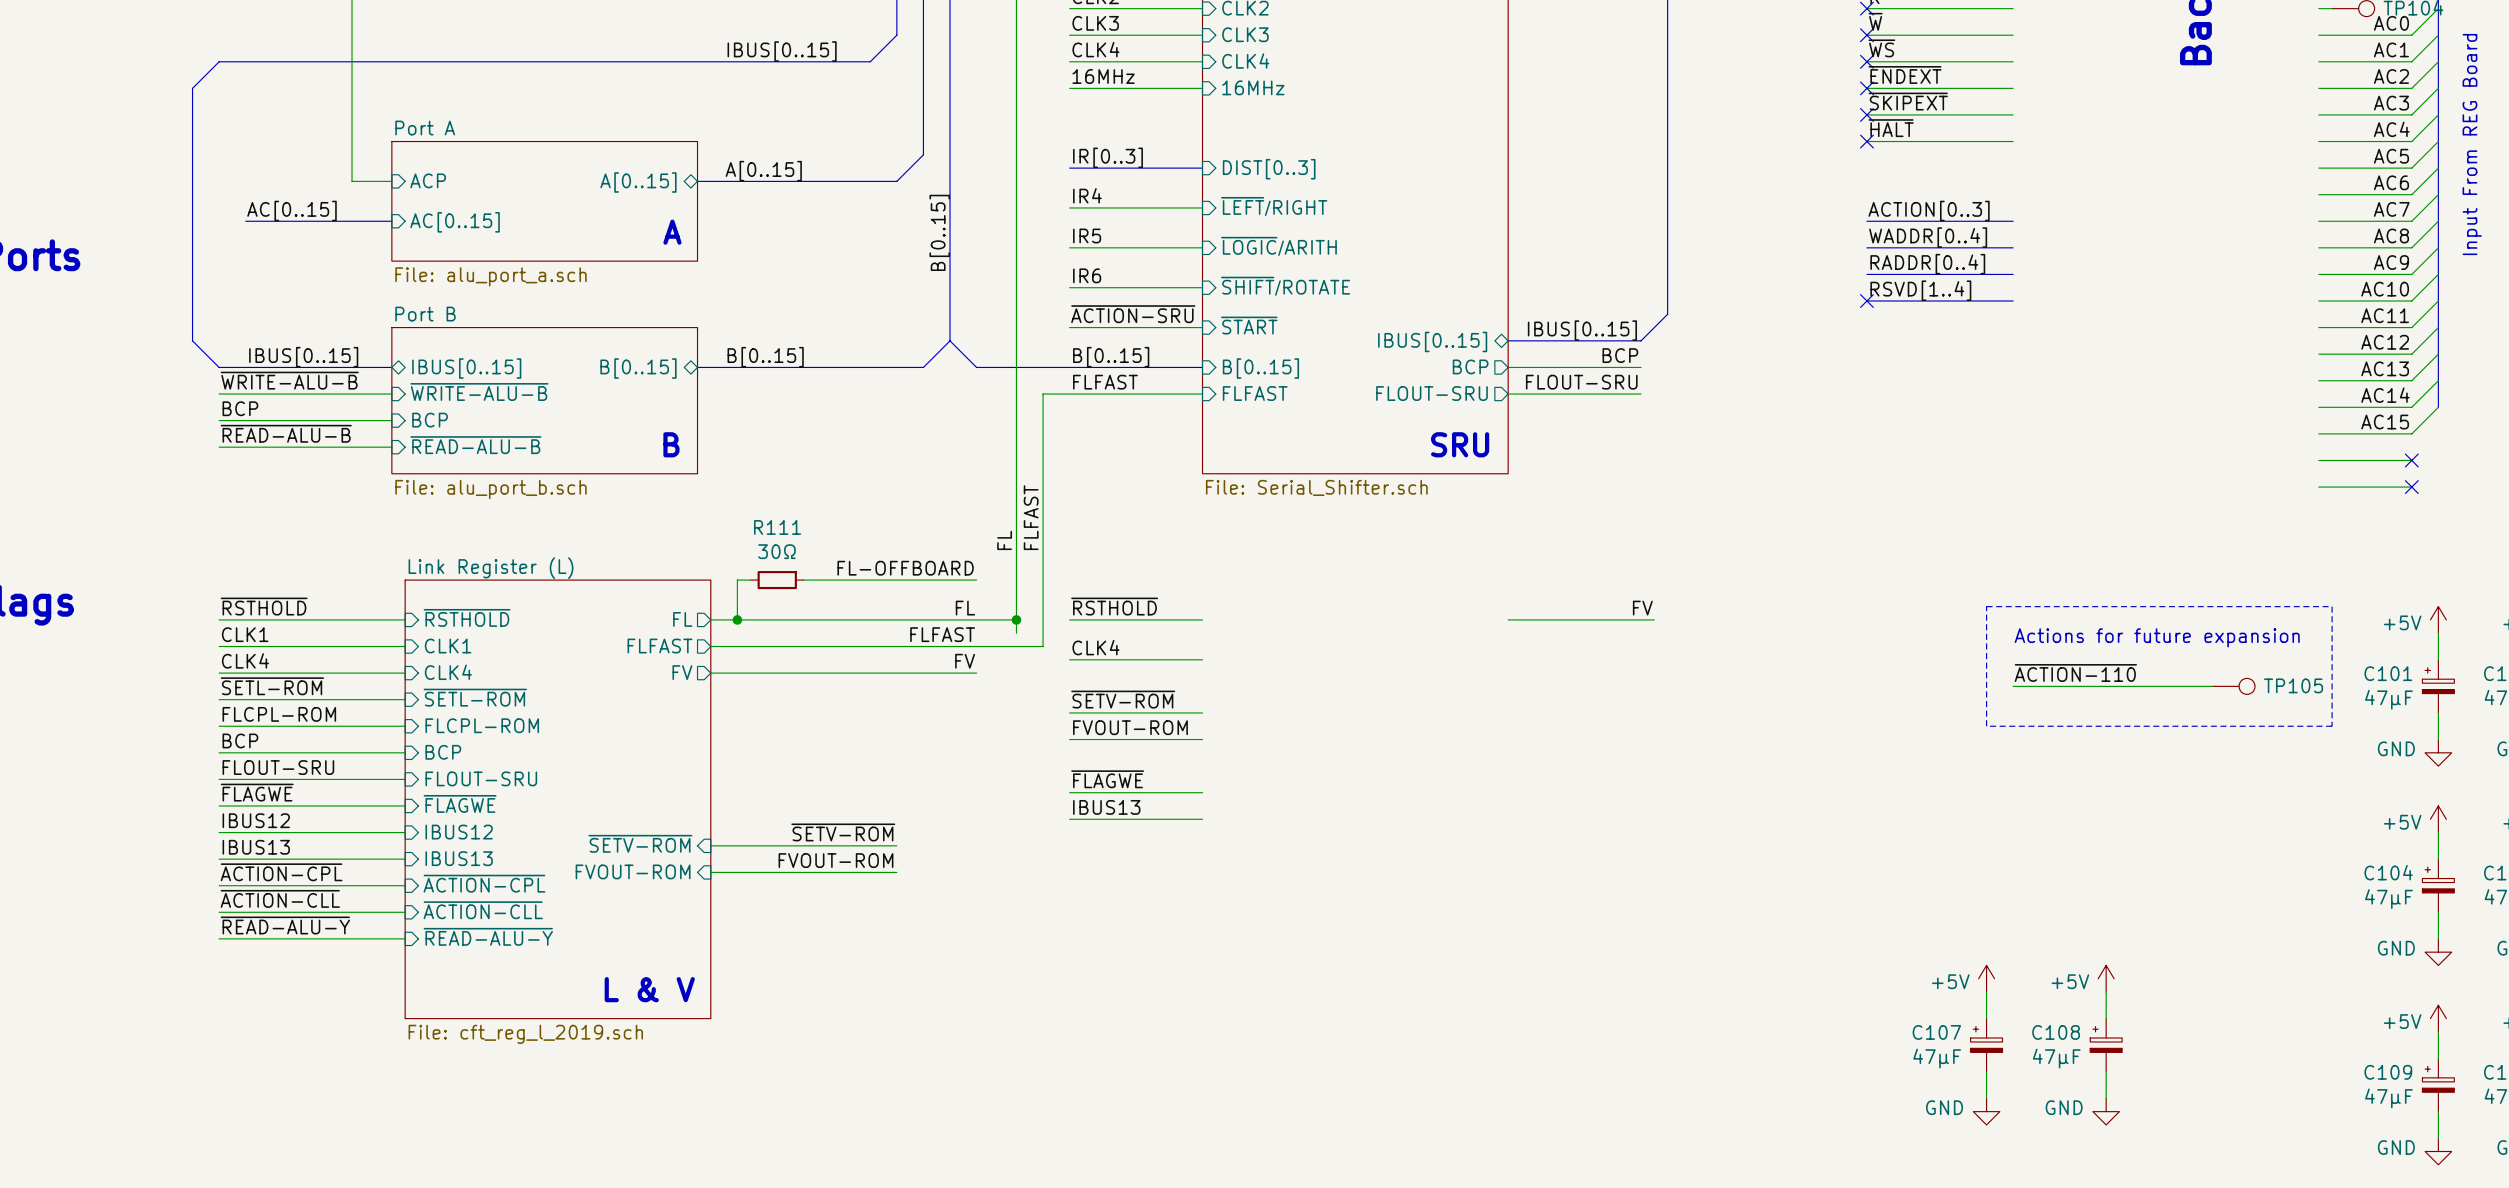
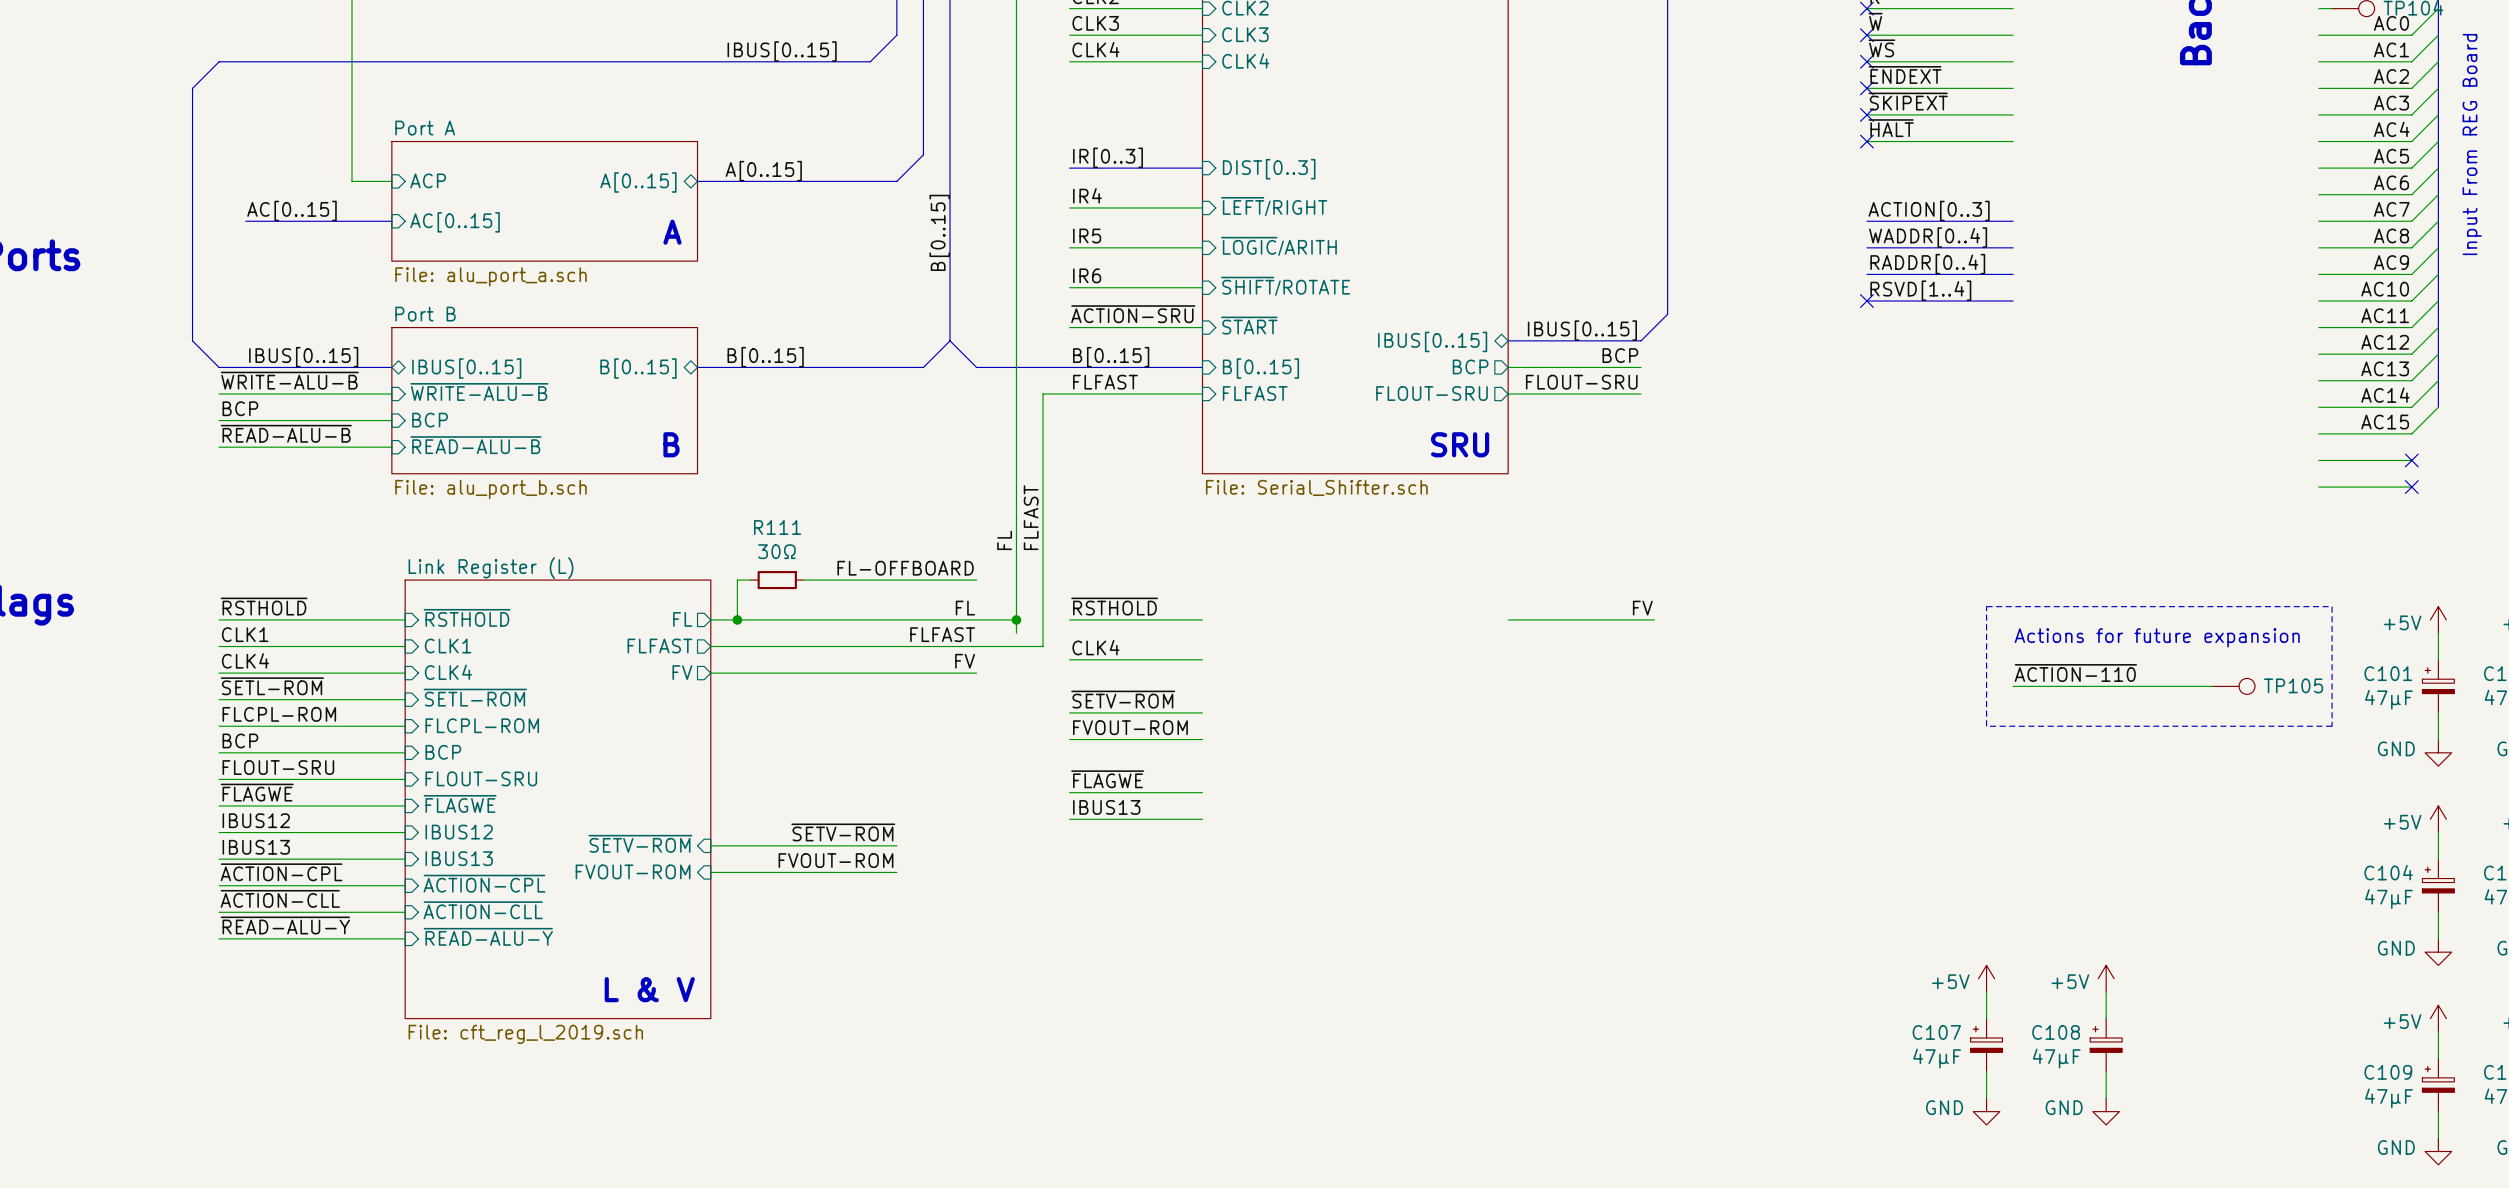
label: 16MHz (1103, 76) -> none
sheet pin: 16MHz (1253, 87) -> none
wire: (1069, 88) (1202, 88) -> none

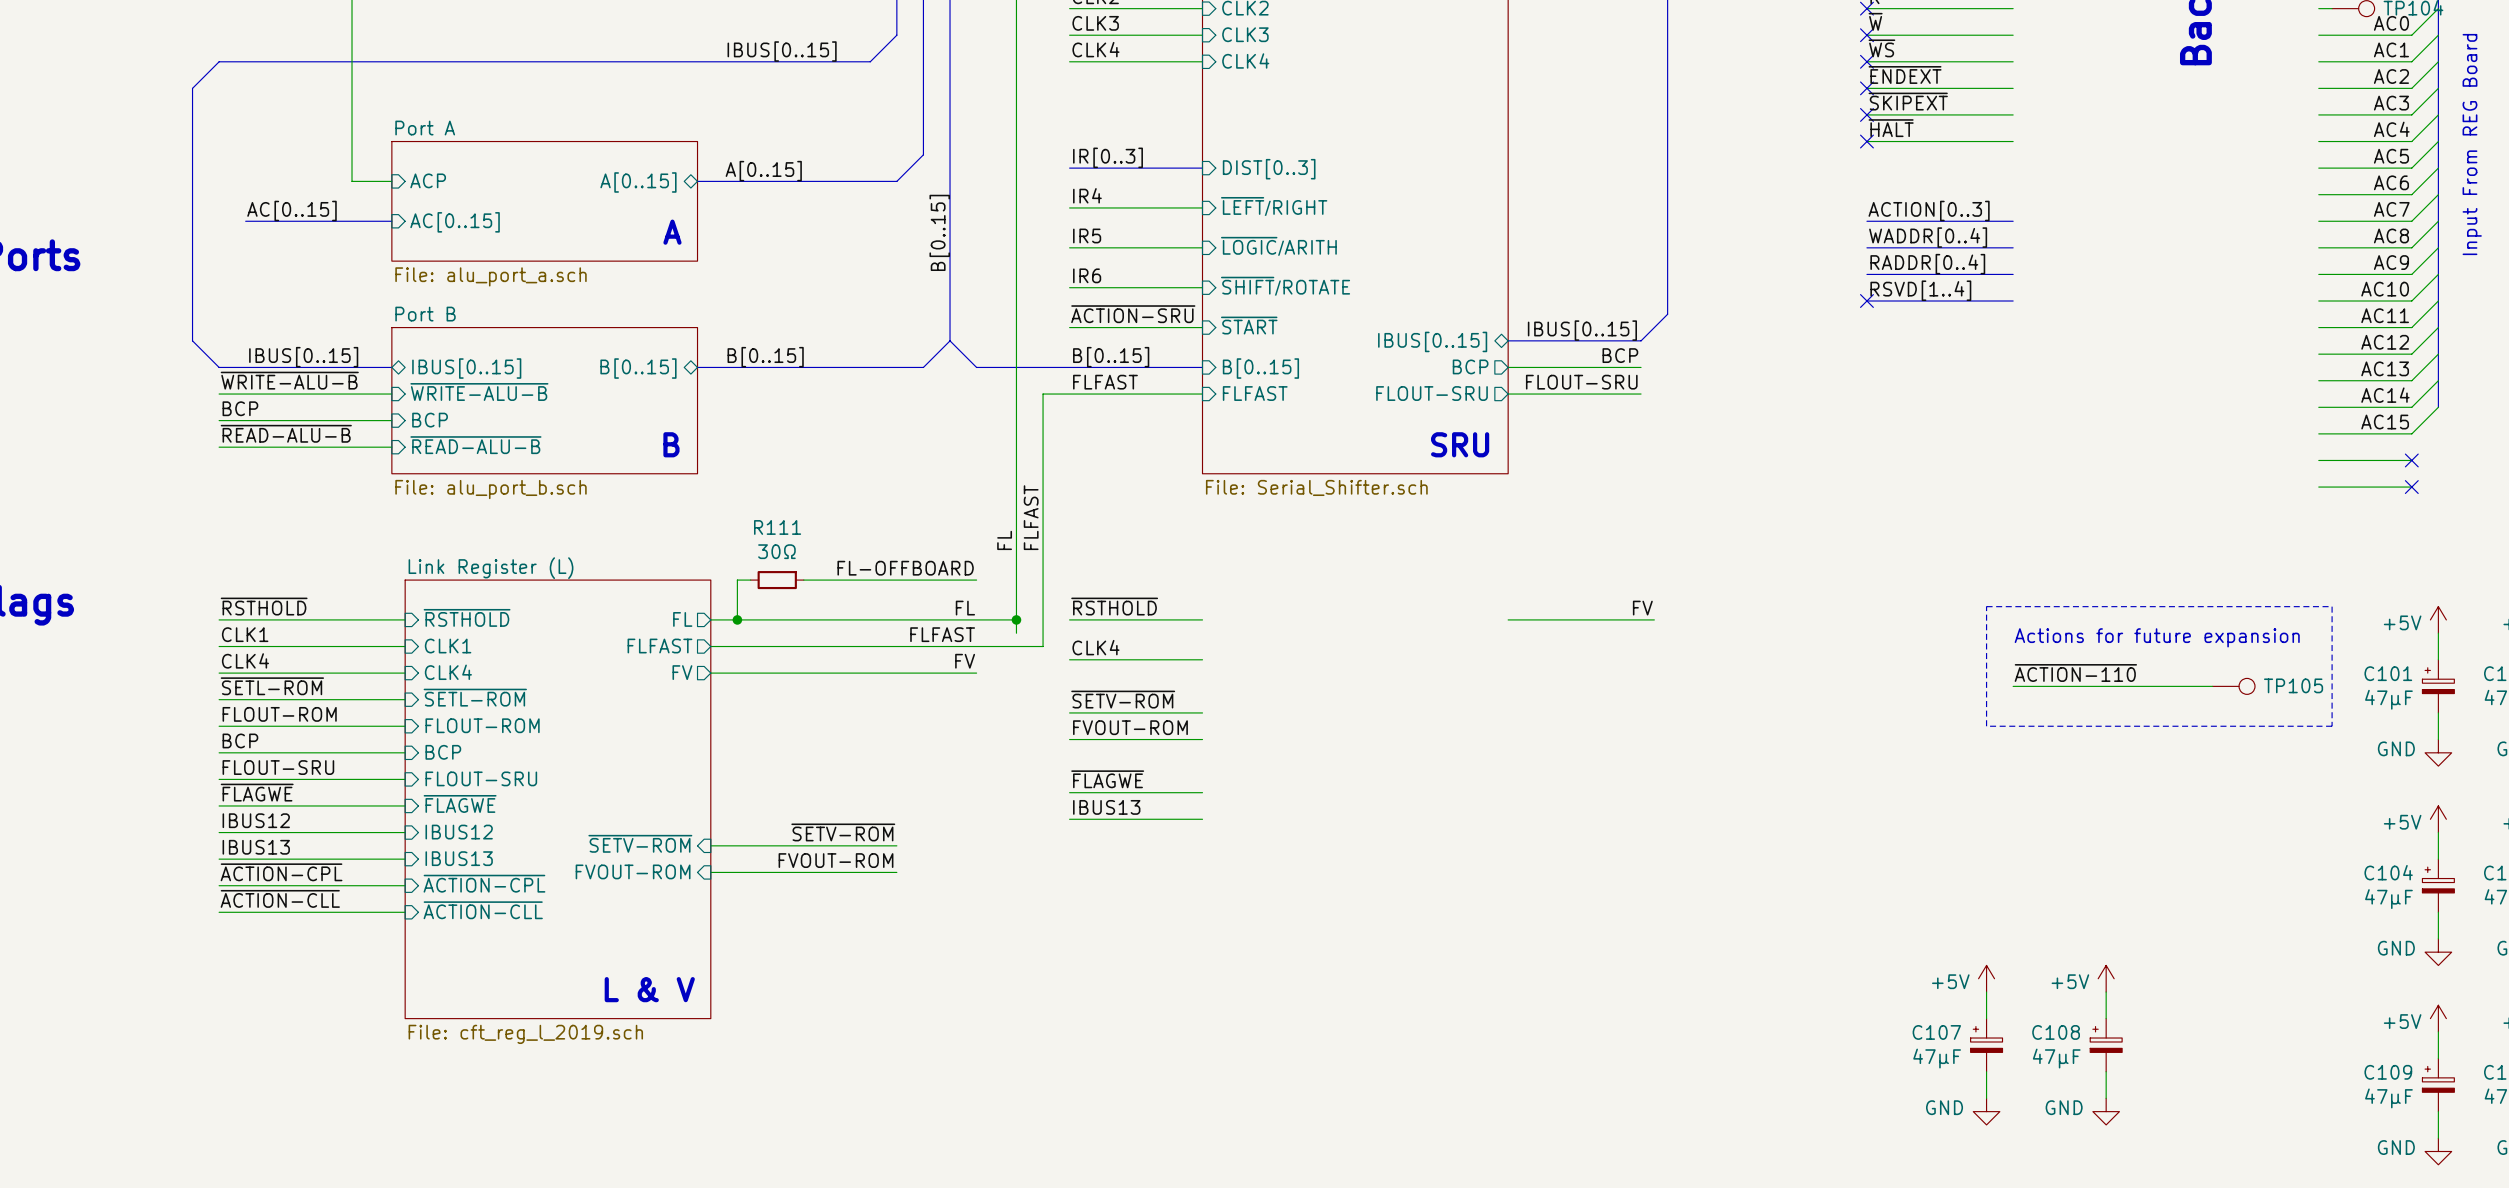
label: FLCPL-ROM (279, 714) -> FLOUT-ROM (279, 714)
sheet pin: FLCPL-ROM (482, 725) -> FLOUT-ROM (482, 725)
label: ~{READ-ALU-Y} (285, 925) -> none
sheet pin: ~{READ-ALU-Y} (488, 936) -> none
wire: (219, 938) (405, 938) -> none

